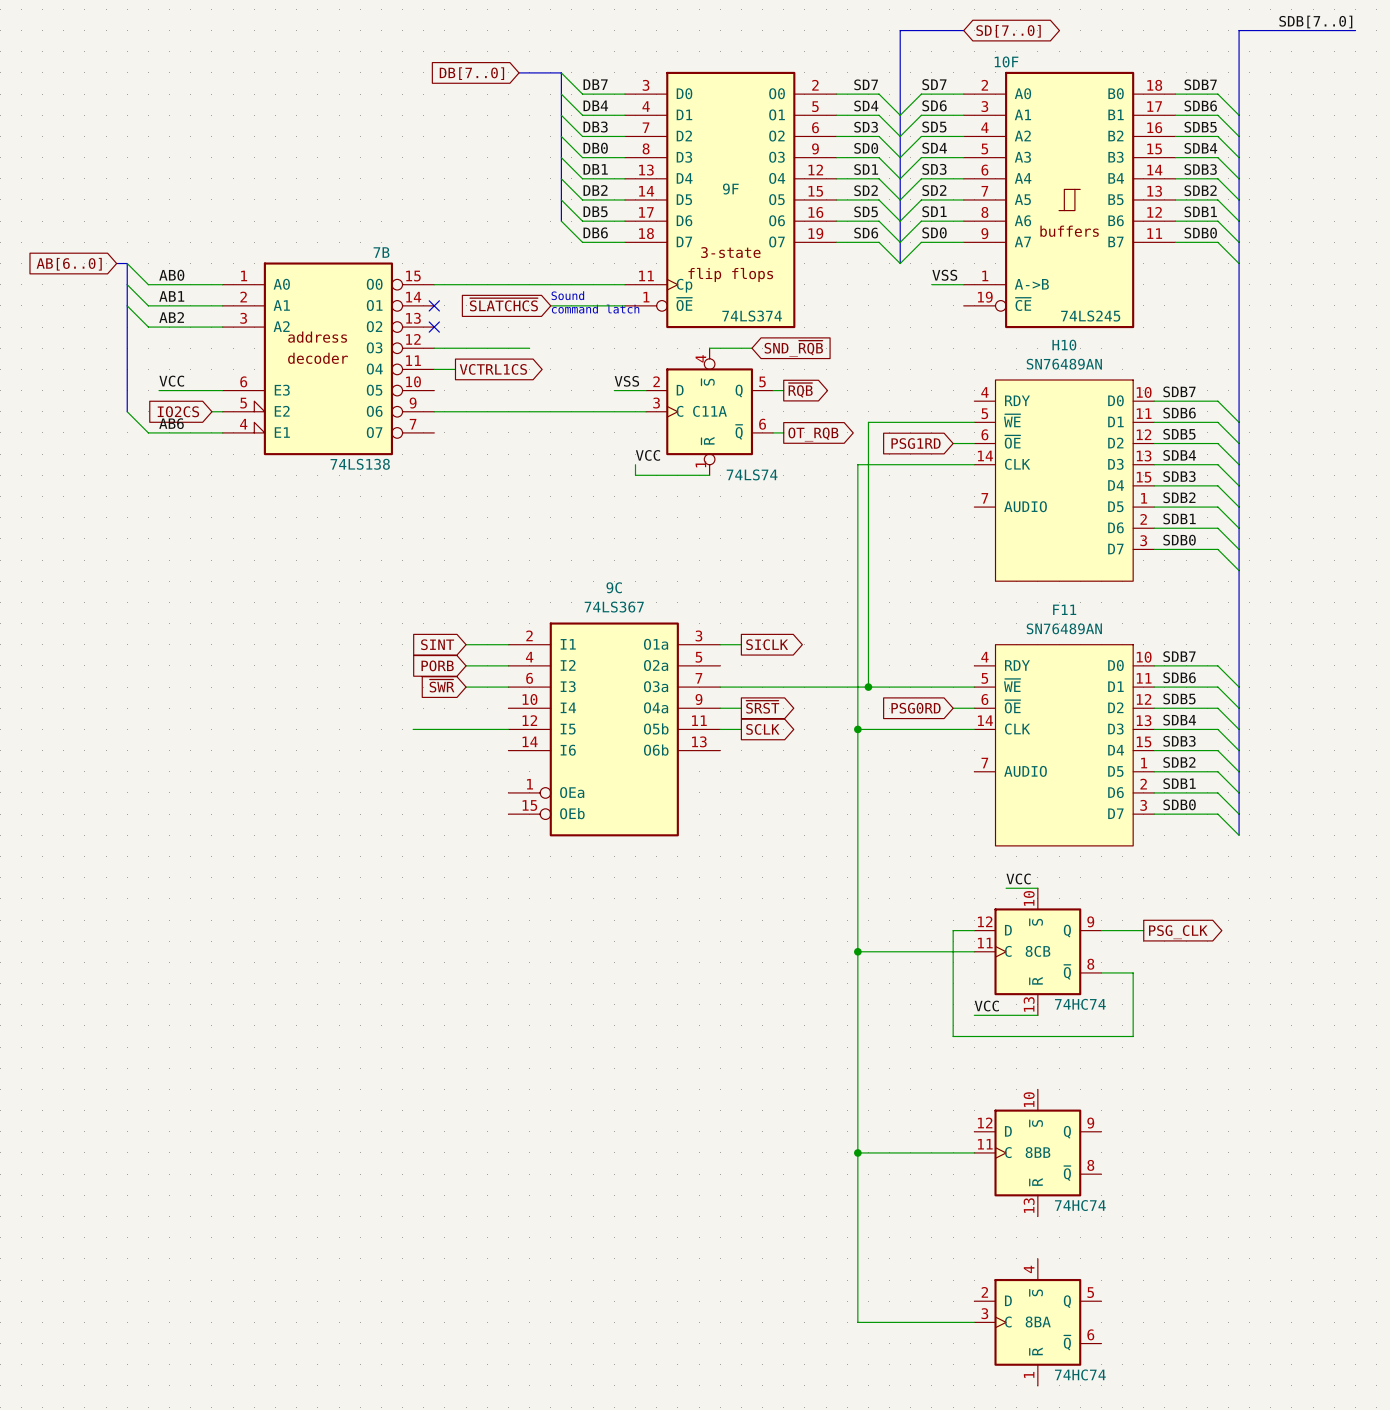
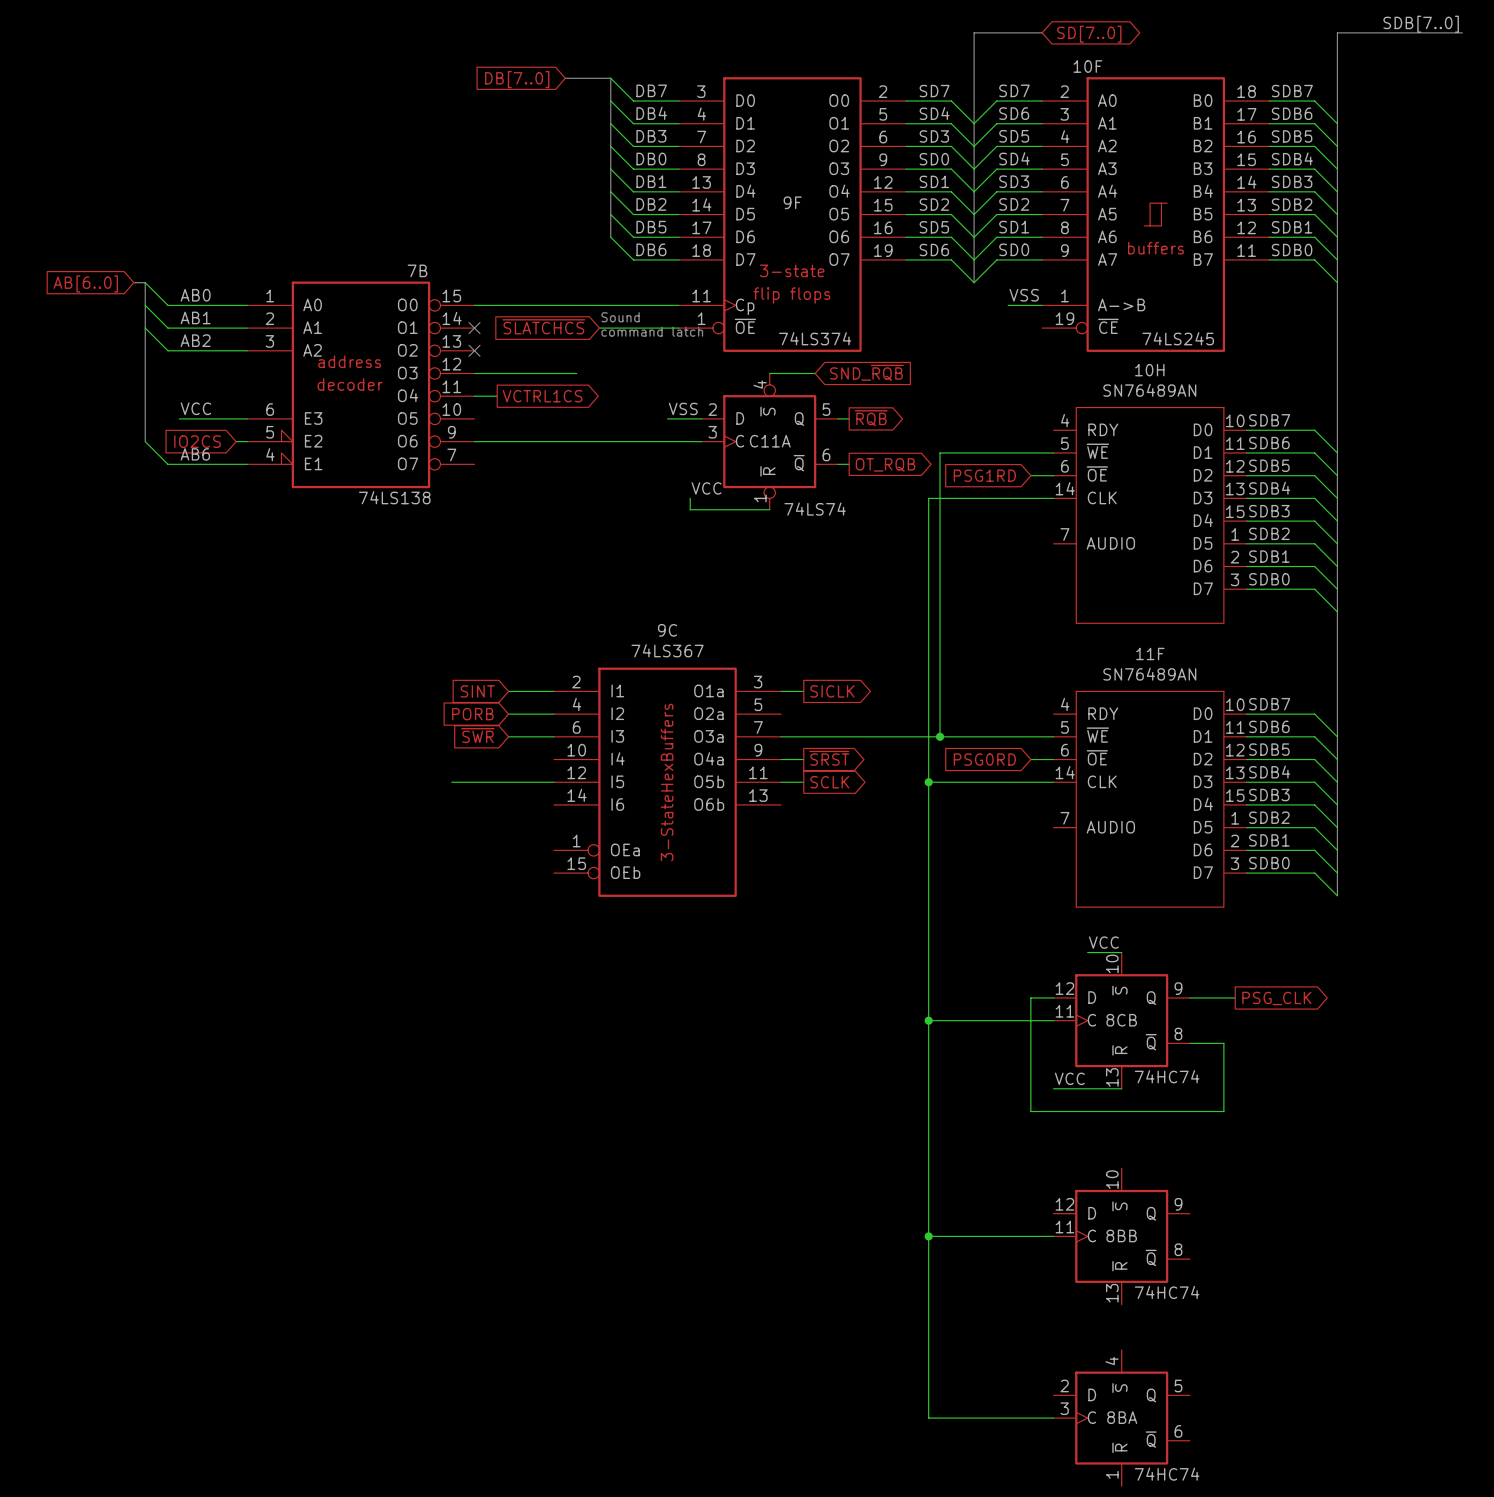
H10 name: H10 (1064, 345) -> 10H (1149, 370)
F11 name: F11 (1064, 609) -> 11F (1150, 653)
9C text: none -> 3-StateHexBuffers (667, 782)

